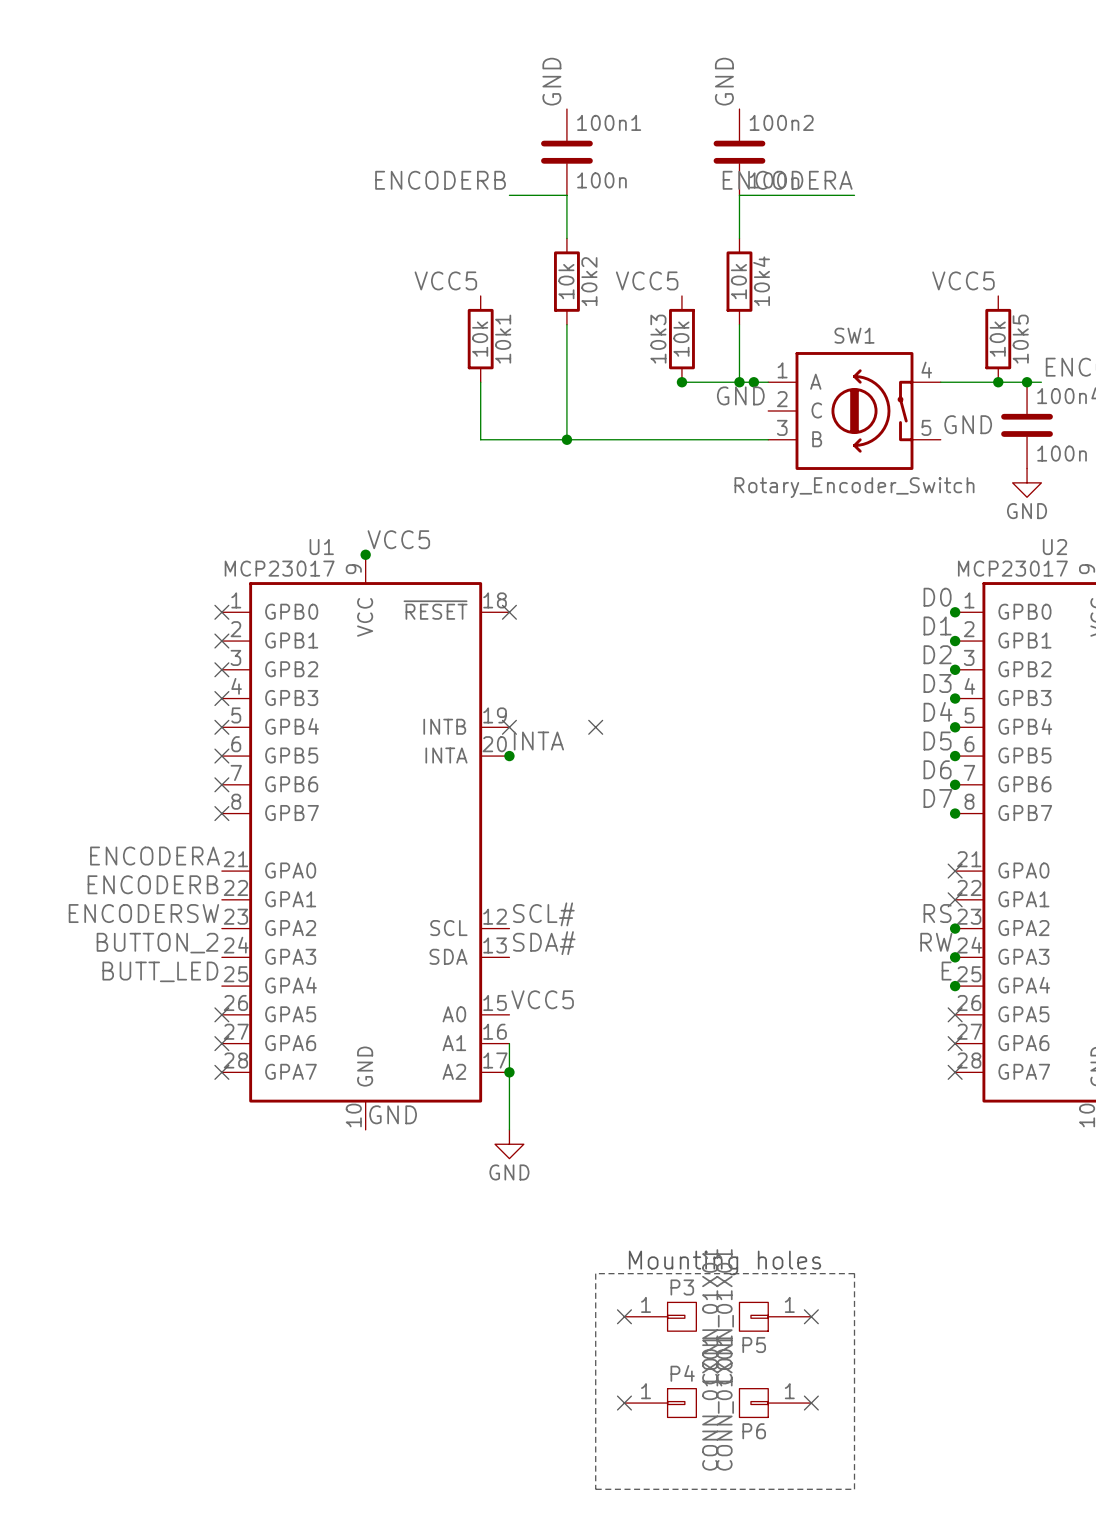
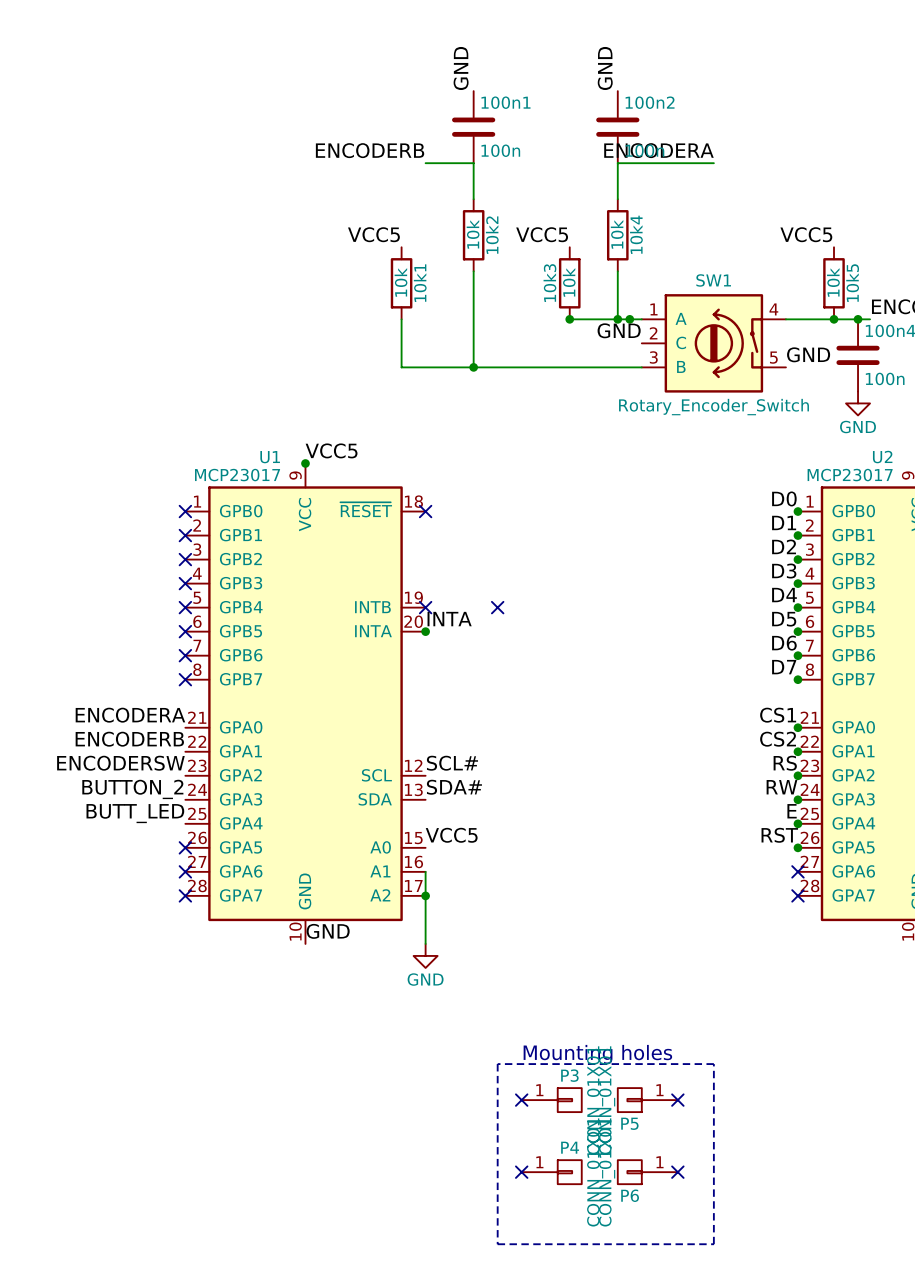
label: none -> CS1 (778, 715)
no-connect mark: (955, 871) -> none
junction: none -> (797, 727)
label: none -> CS2 (778, 739)
no-connect mark: (955, 899) -> none
junction: none -> (797, 751)
label: none -> RST (779, 835)
no-connect mark: (955, 1014) -> none
junction: none -> (797, 847)

